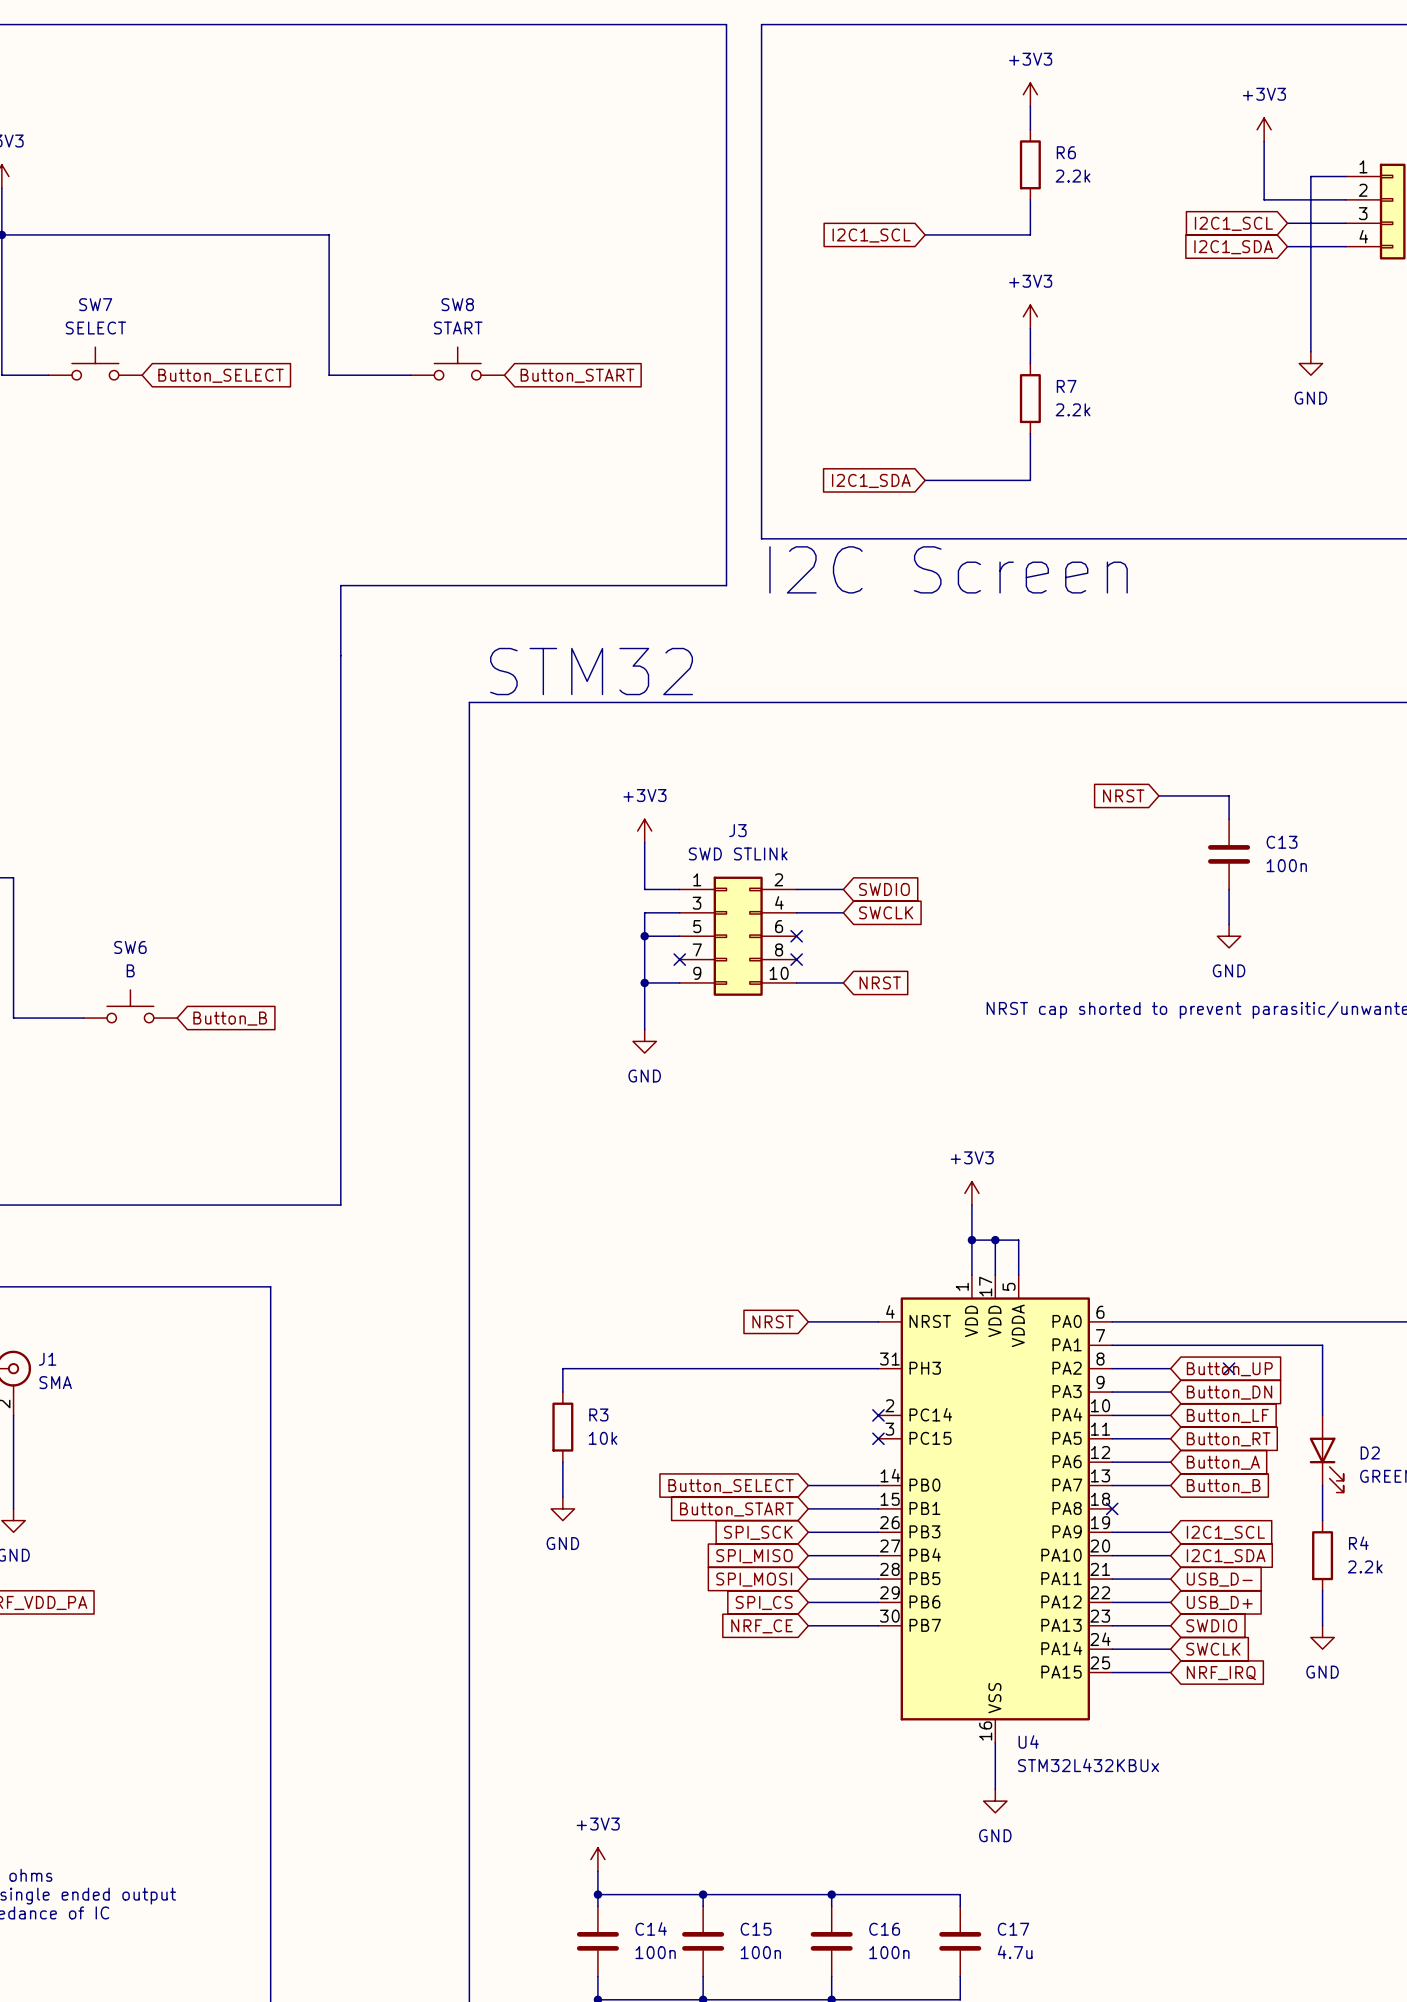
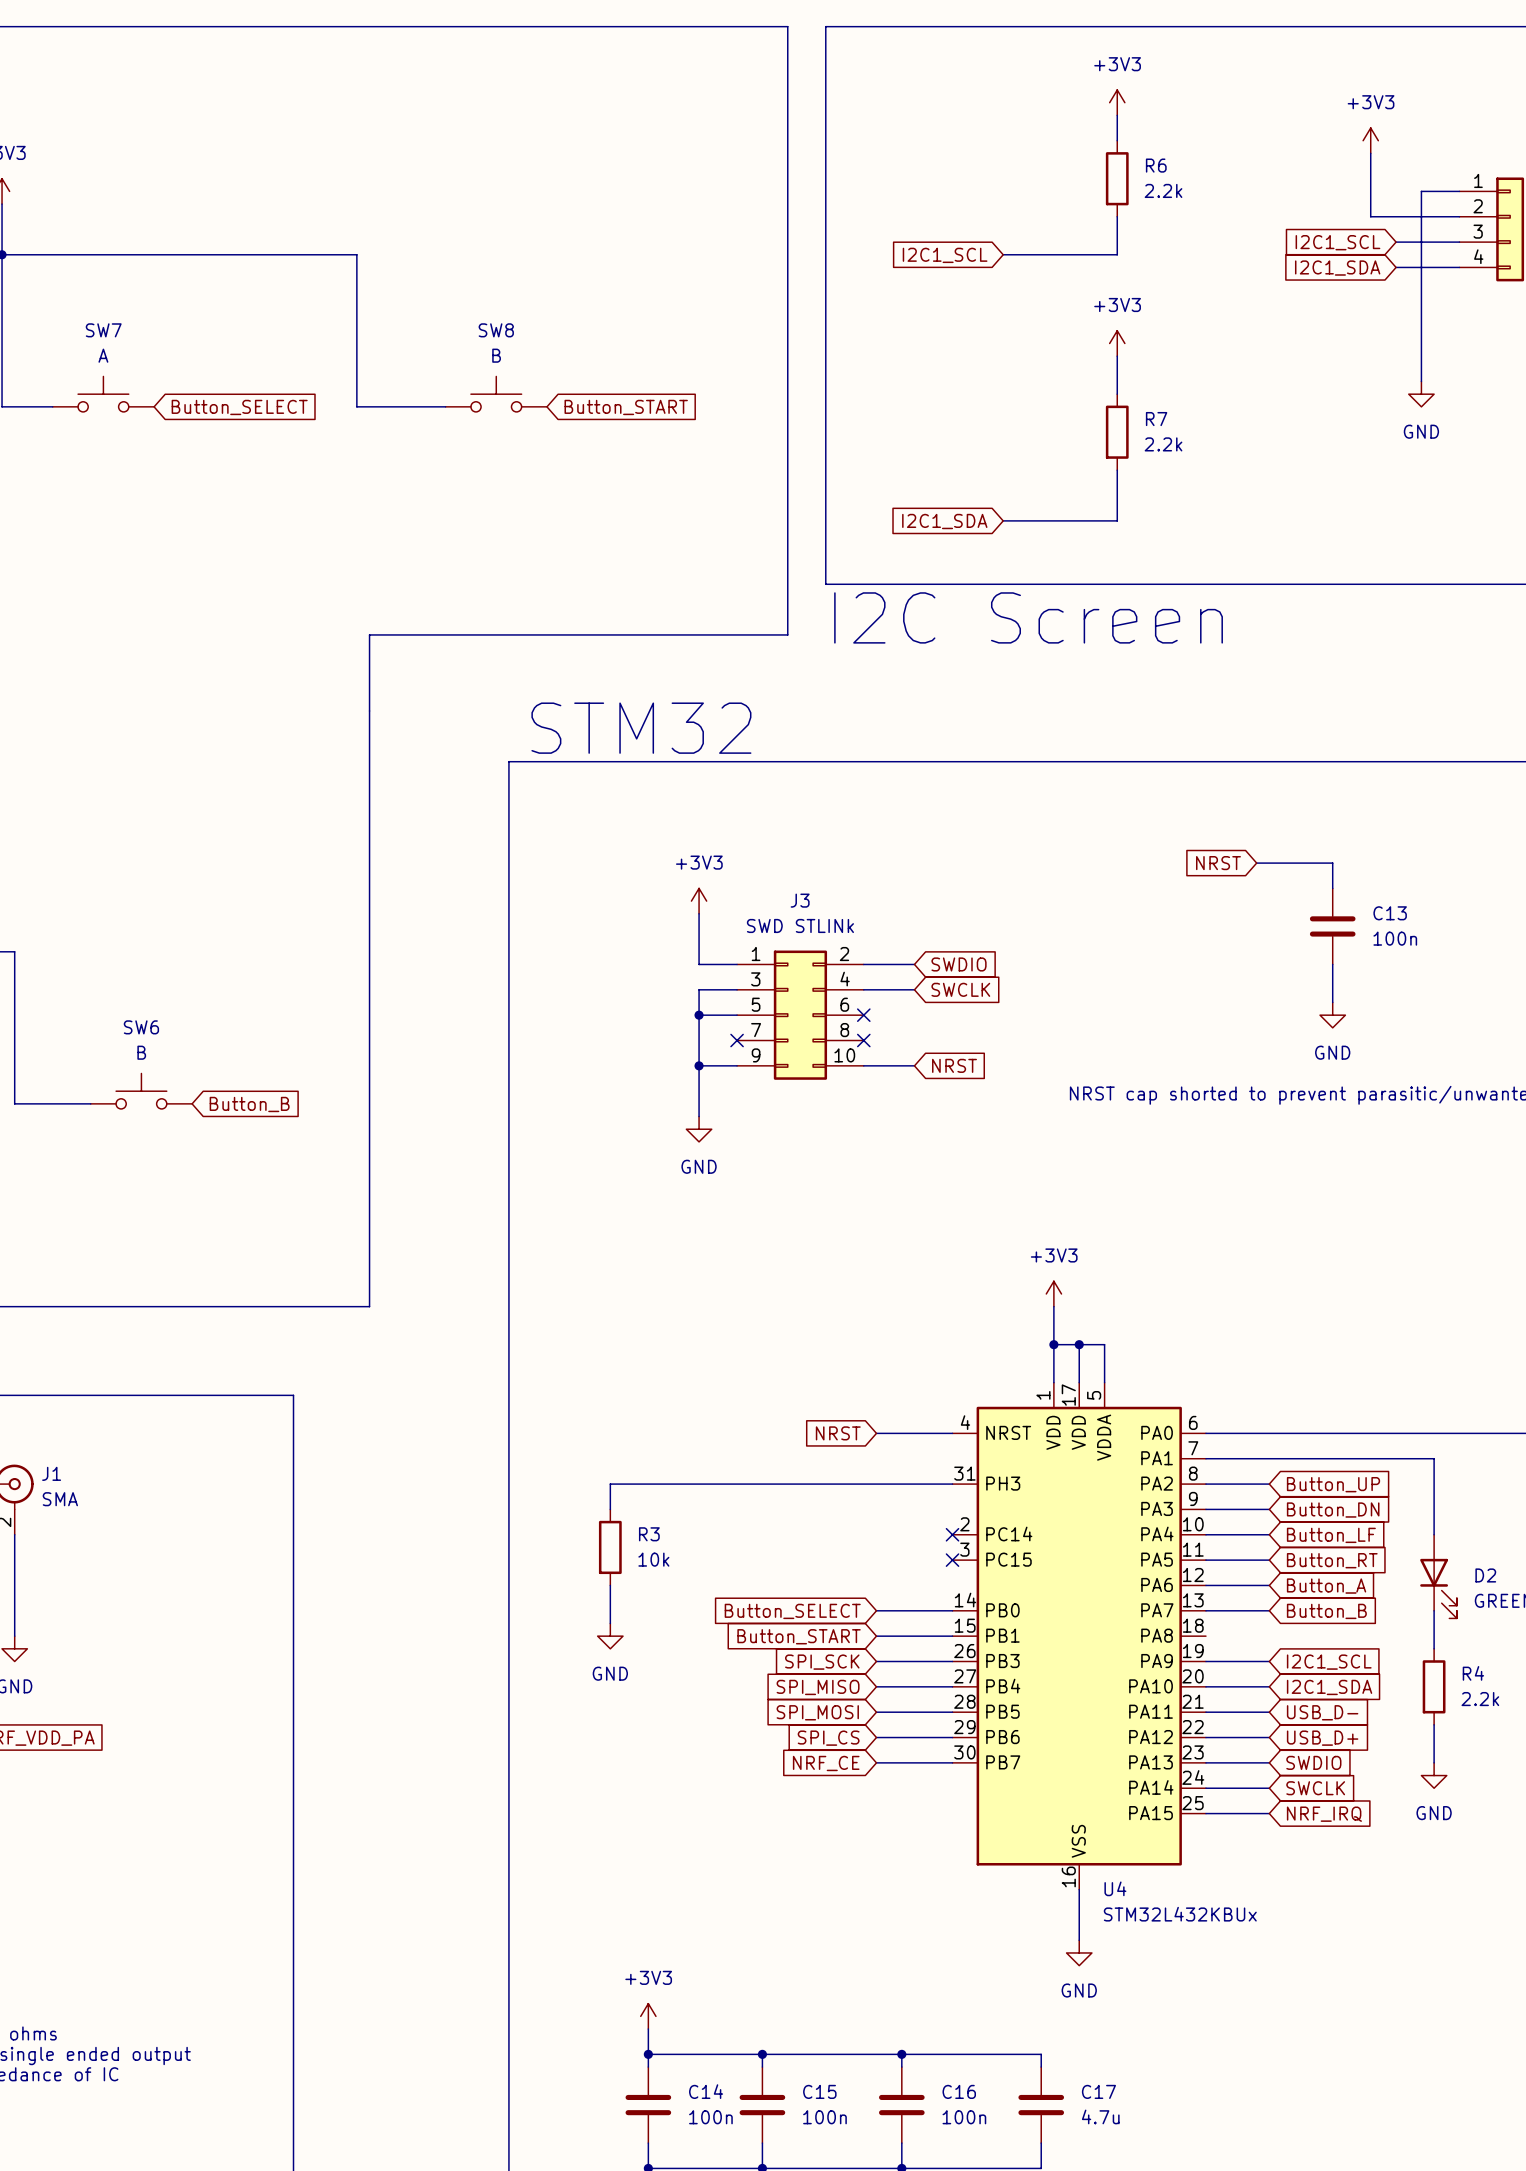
SW7 value: SELECT (95, 328) -> A (103, 355)
SW8 value: START (458, 328) -> B (496, 355)
no-connect mark: (1229, 1368) -> none
no-connect mark: (1112, 1508) -> none

